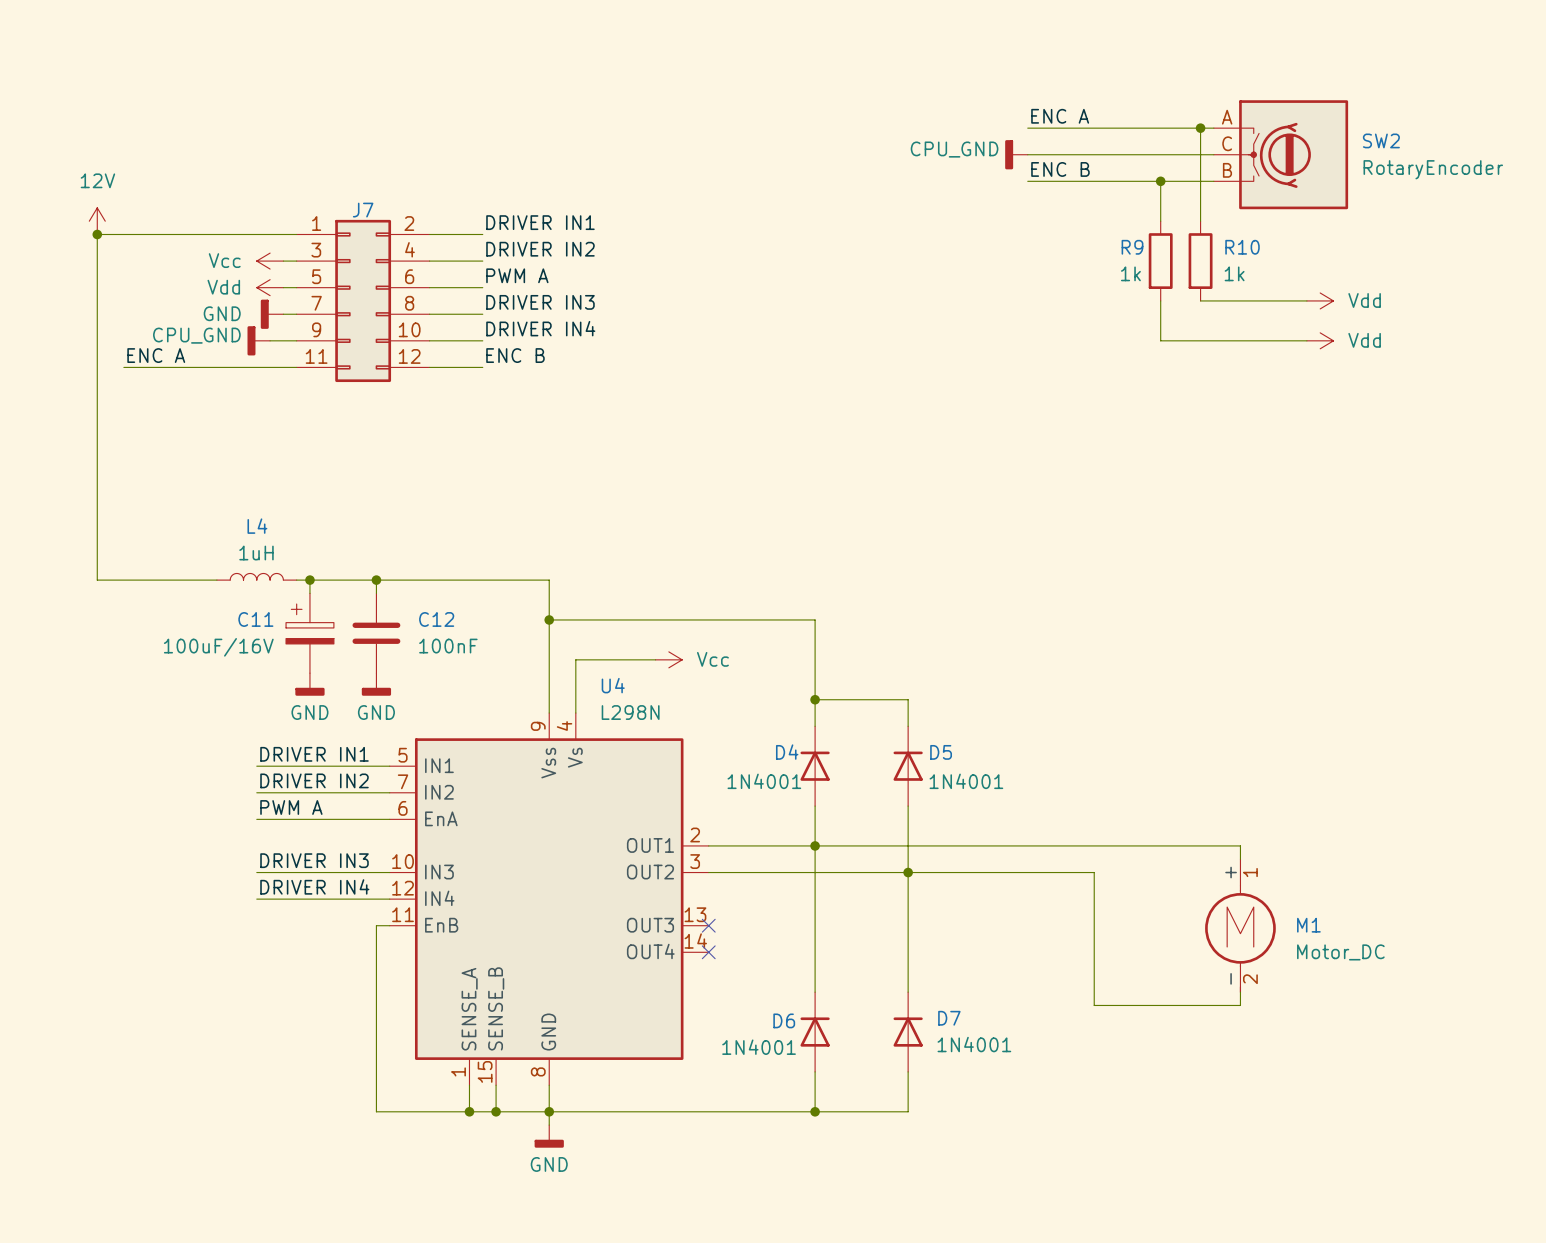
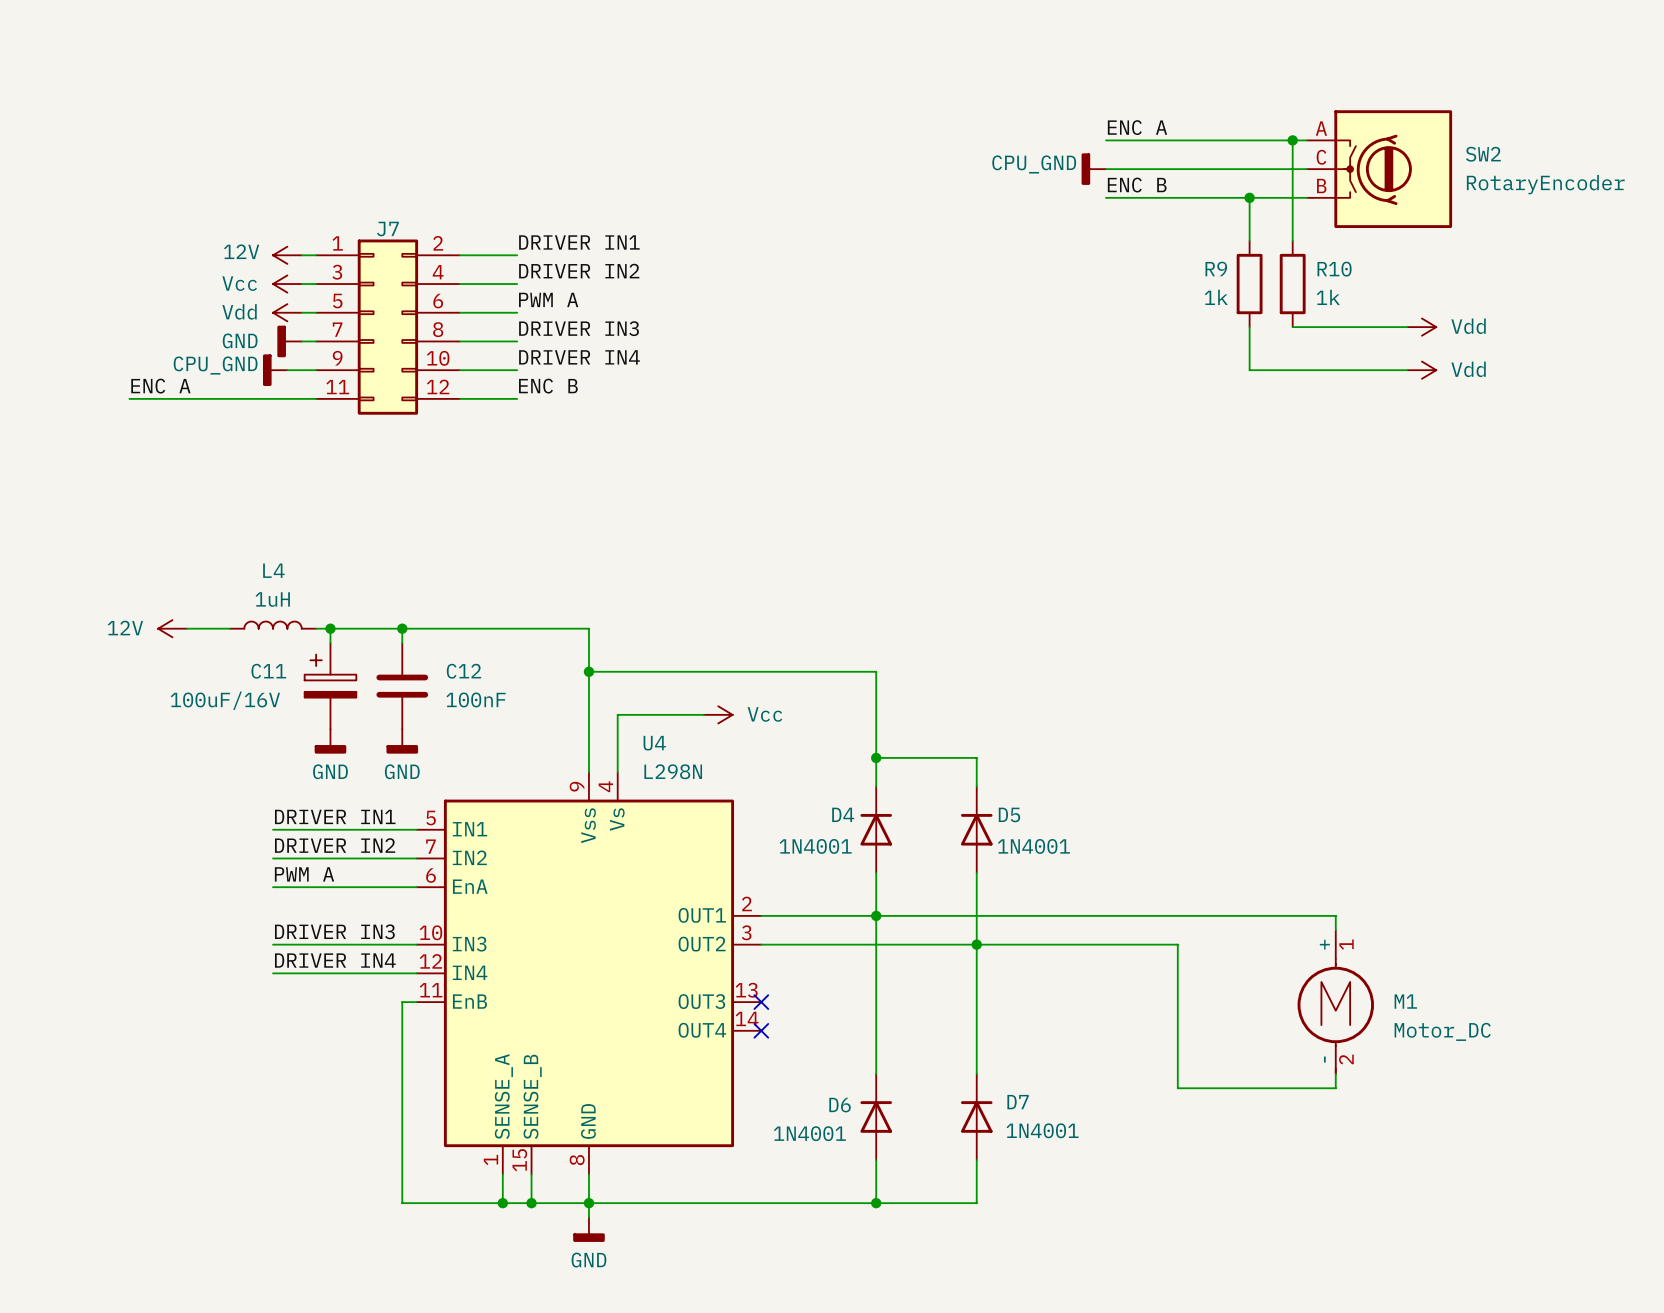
power symbol rotation: 0° (97, 221) -> 90° counterclockwise (287, 255)
power symbol position: 12V (97, 221) -> 12V (287, 255)
junction: (97, 234) -> none
wire: (283, 234) (97, 234) (97, 580) (177, 580) -> none
power symbol: none -> 12V (172, 628)

